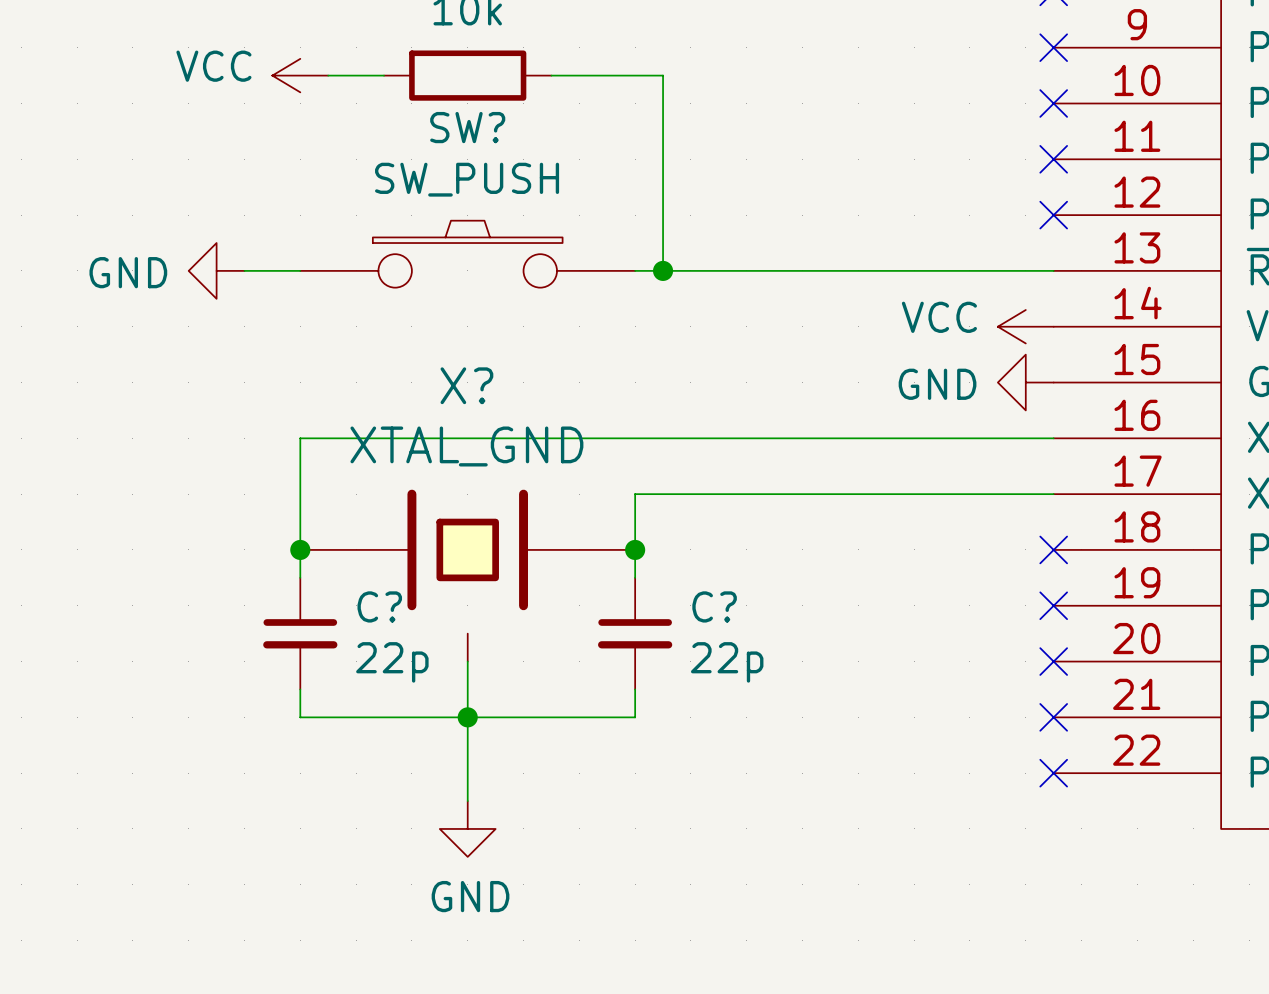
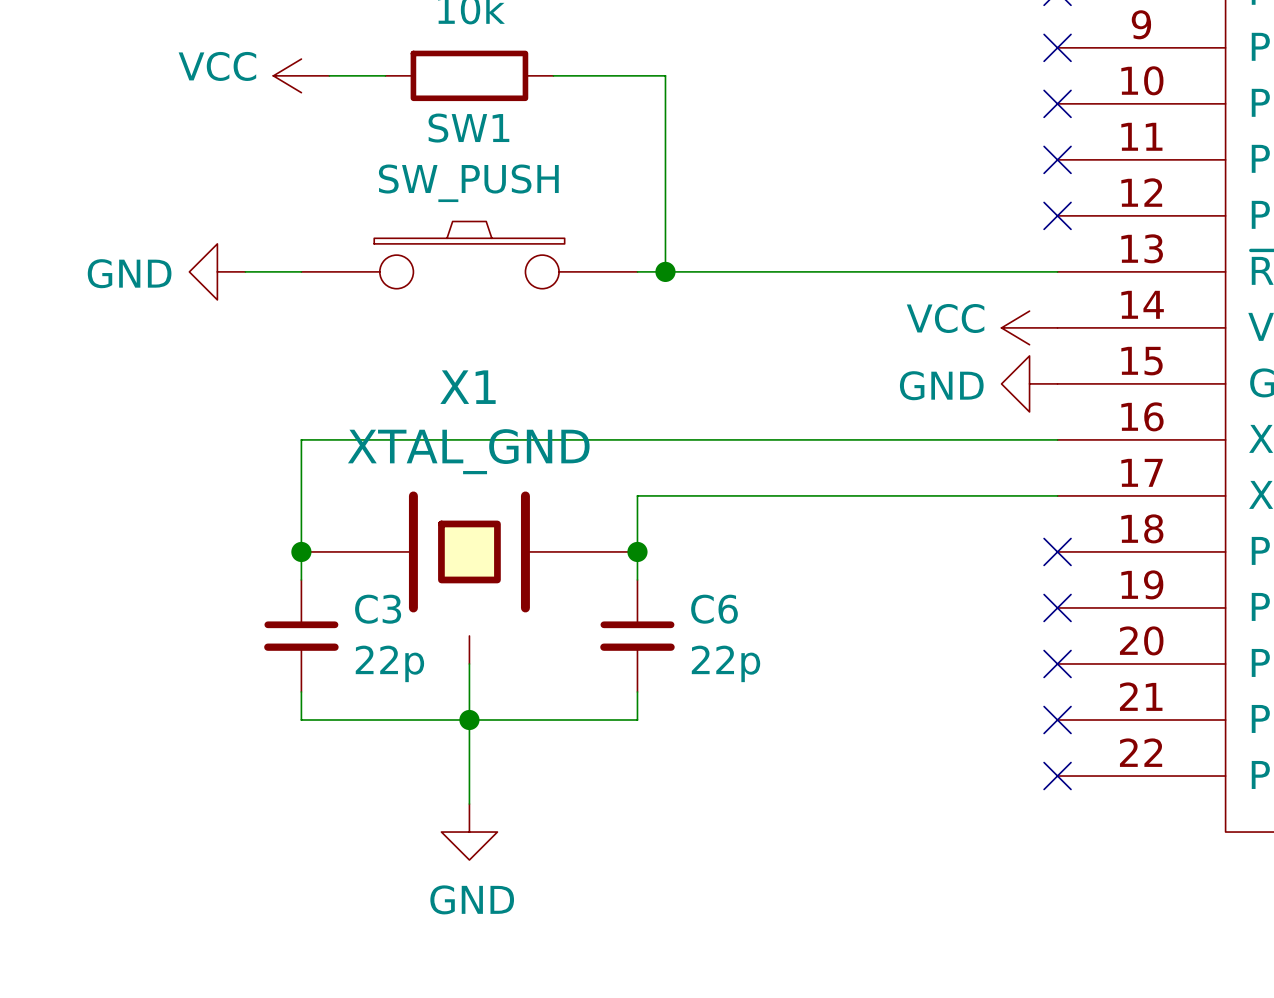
SW? name: SW? (467, 127) -> SW1 (468, 128)
X? name: X? (466, 385) -> X1 (468, 387)
C? name: C? (379, 606) -> C3 (378, 609)
C? name: C? (714, 606) -> C6 (714, 609)

